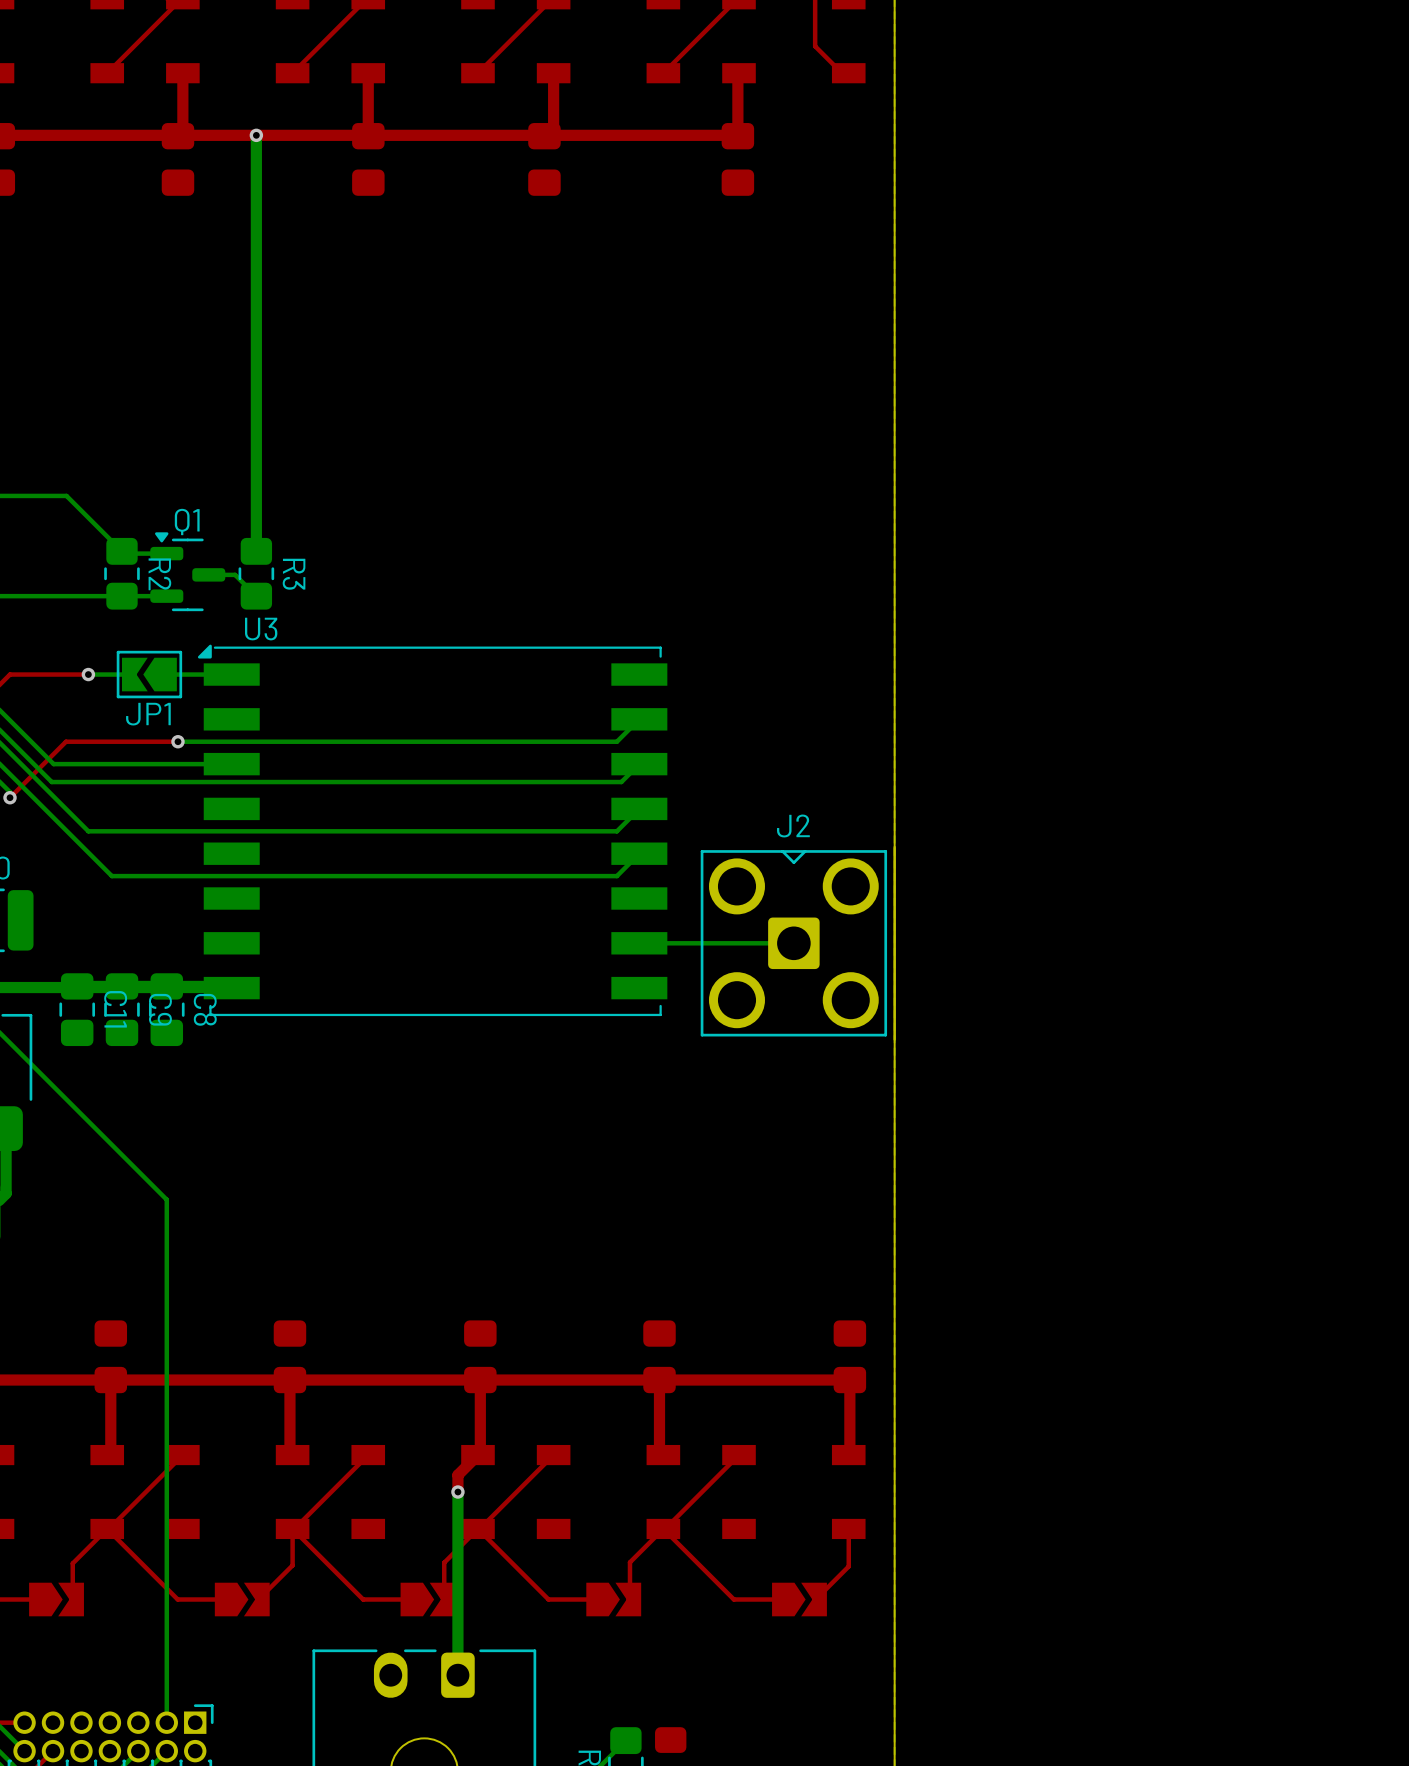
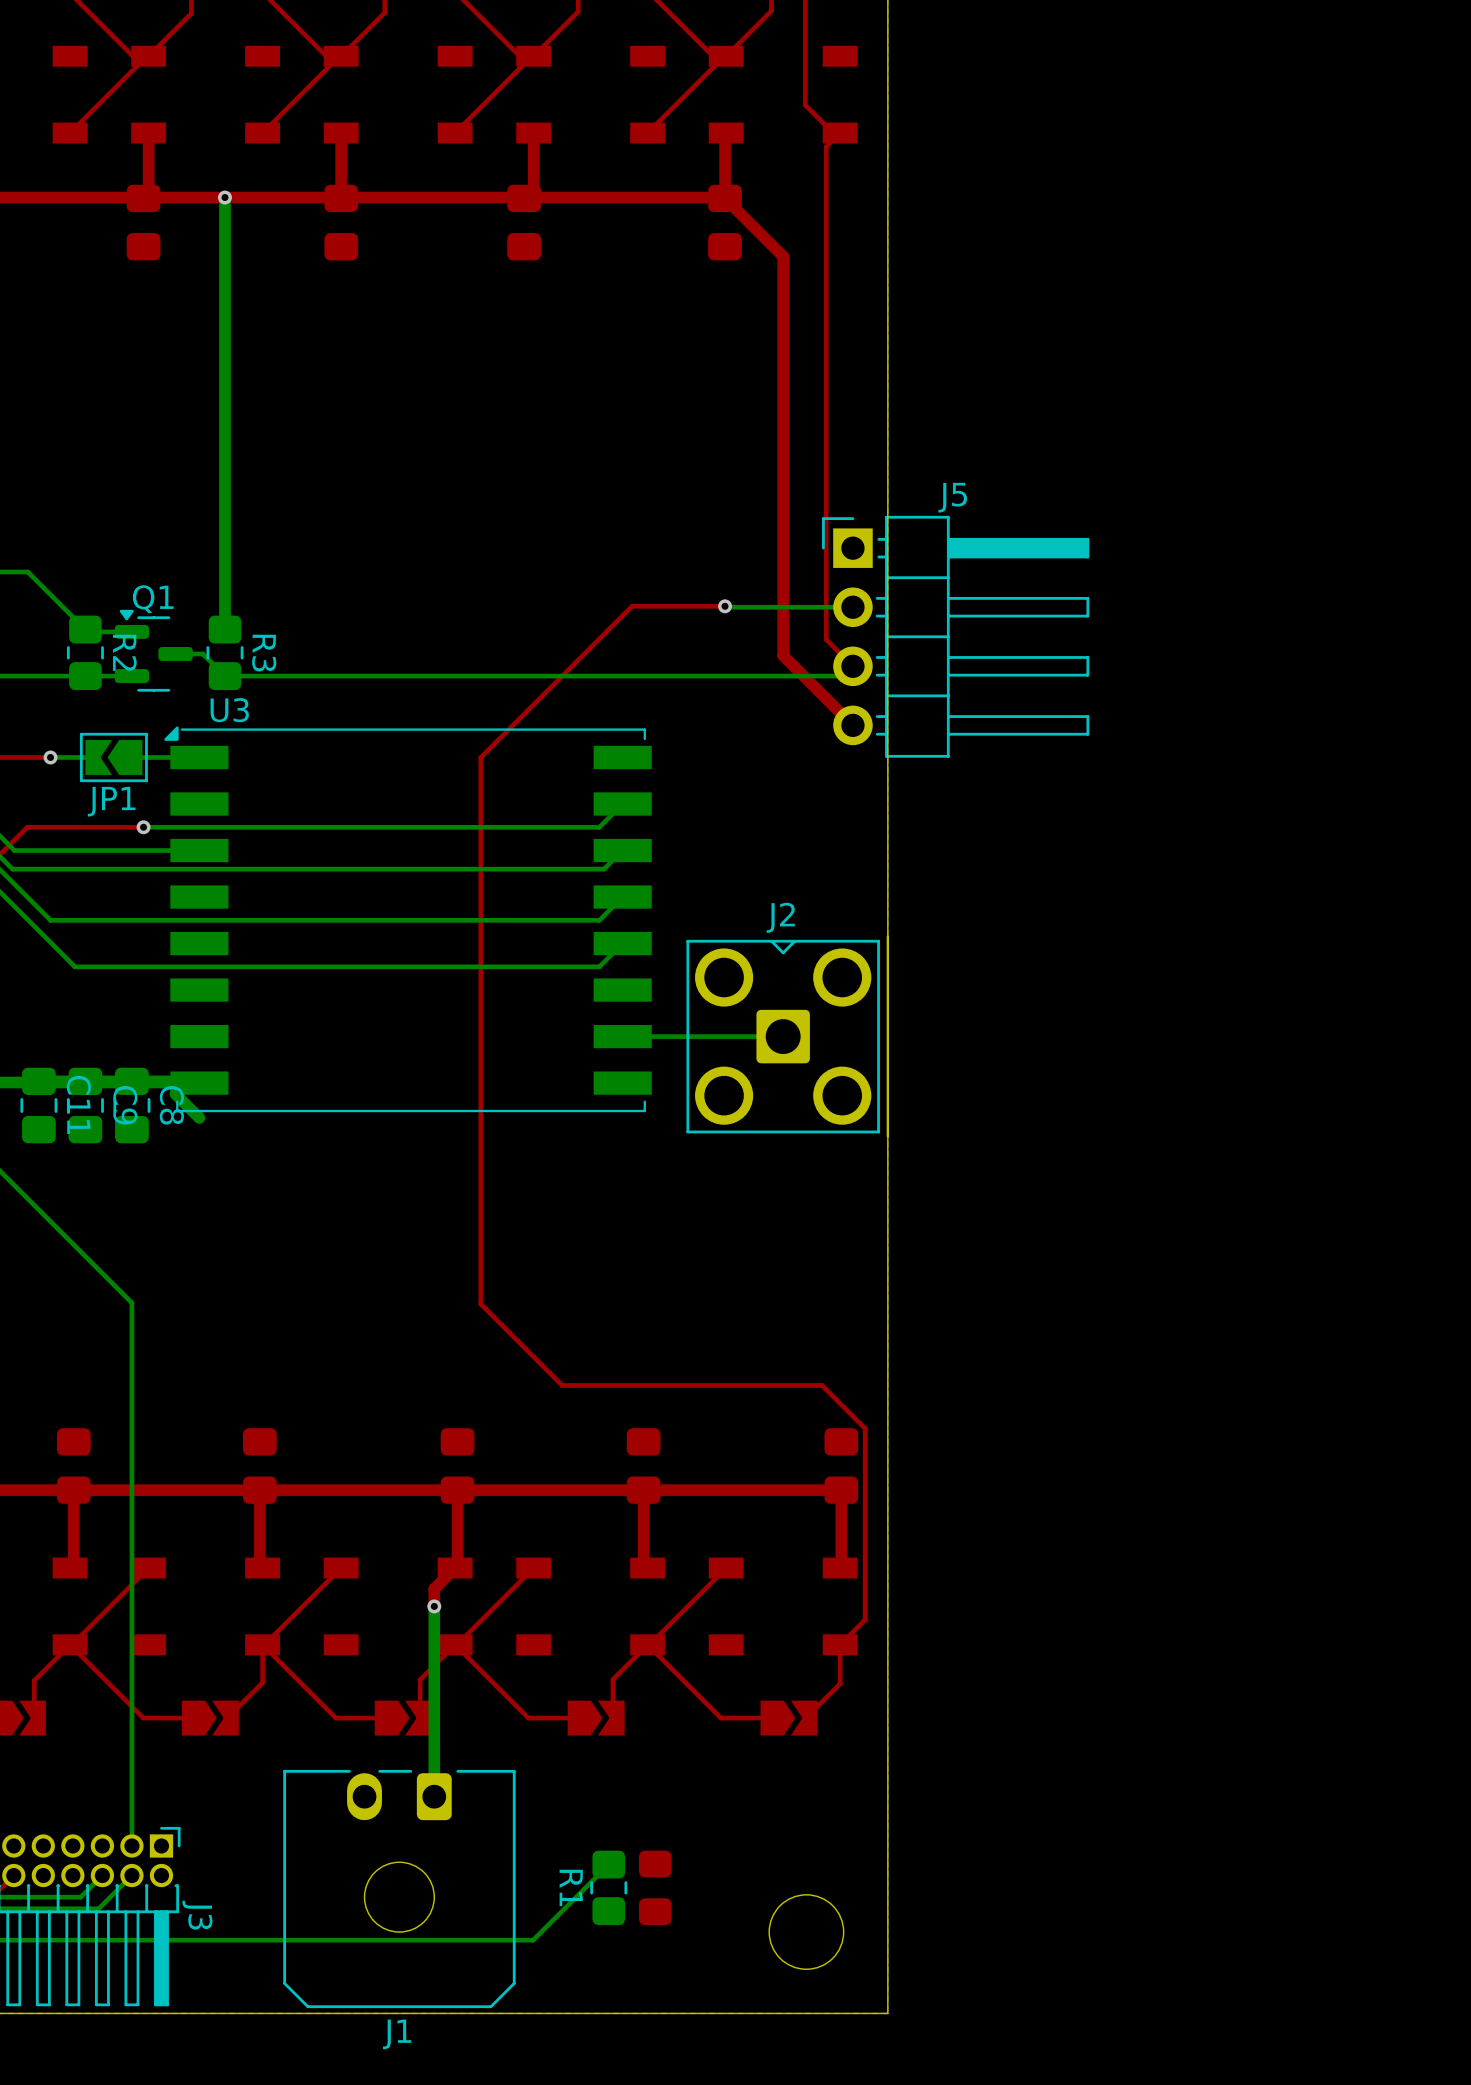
top track: none -> (840, 133) (826, 146) (826, 639) (852, 666)
top track: none -> (725, 198) (783, 256) (783, 655) (852, 725)
top track: none -> (725, 606) (631, 606) (480, 757) (480, 1304) (562, 1385) (822, 1385) (865, 1428) (865, 1619) (840, 1644)
bottom track: none -> (725, 606) (852, 607)
via: none -> (725, 606)
J5: none -> (955, 636)
bottom track: none -> (852, 666) (843, 676) (224, 676)
bottom track: none -> (175, 1093) (199, 1118)

